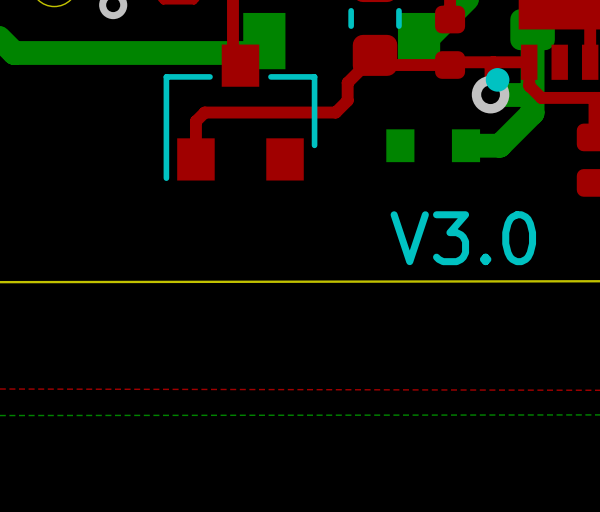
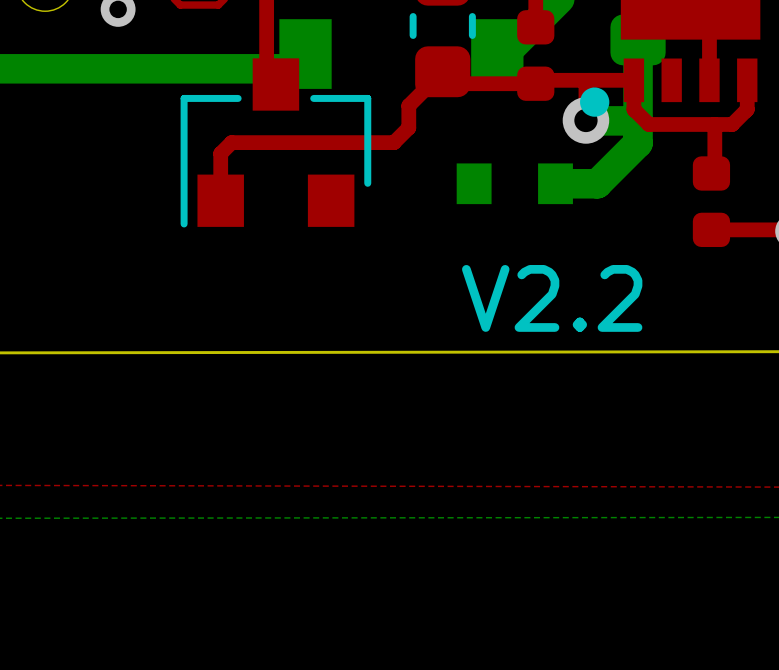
text: V3.0 (463, 238) -> V2.2 (552, 298)

